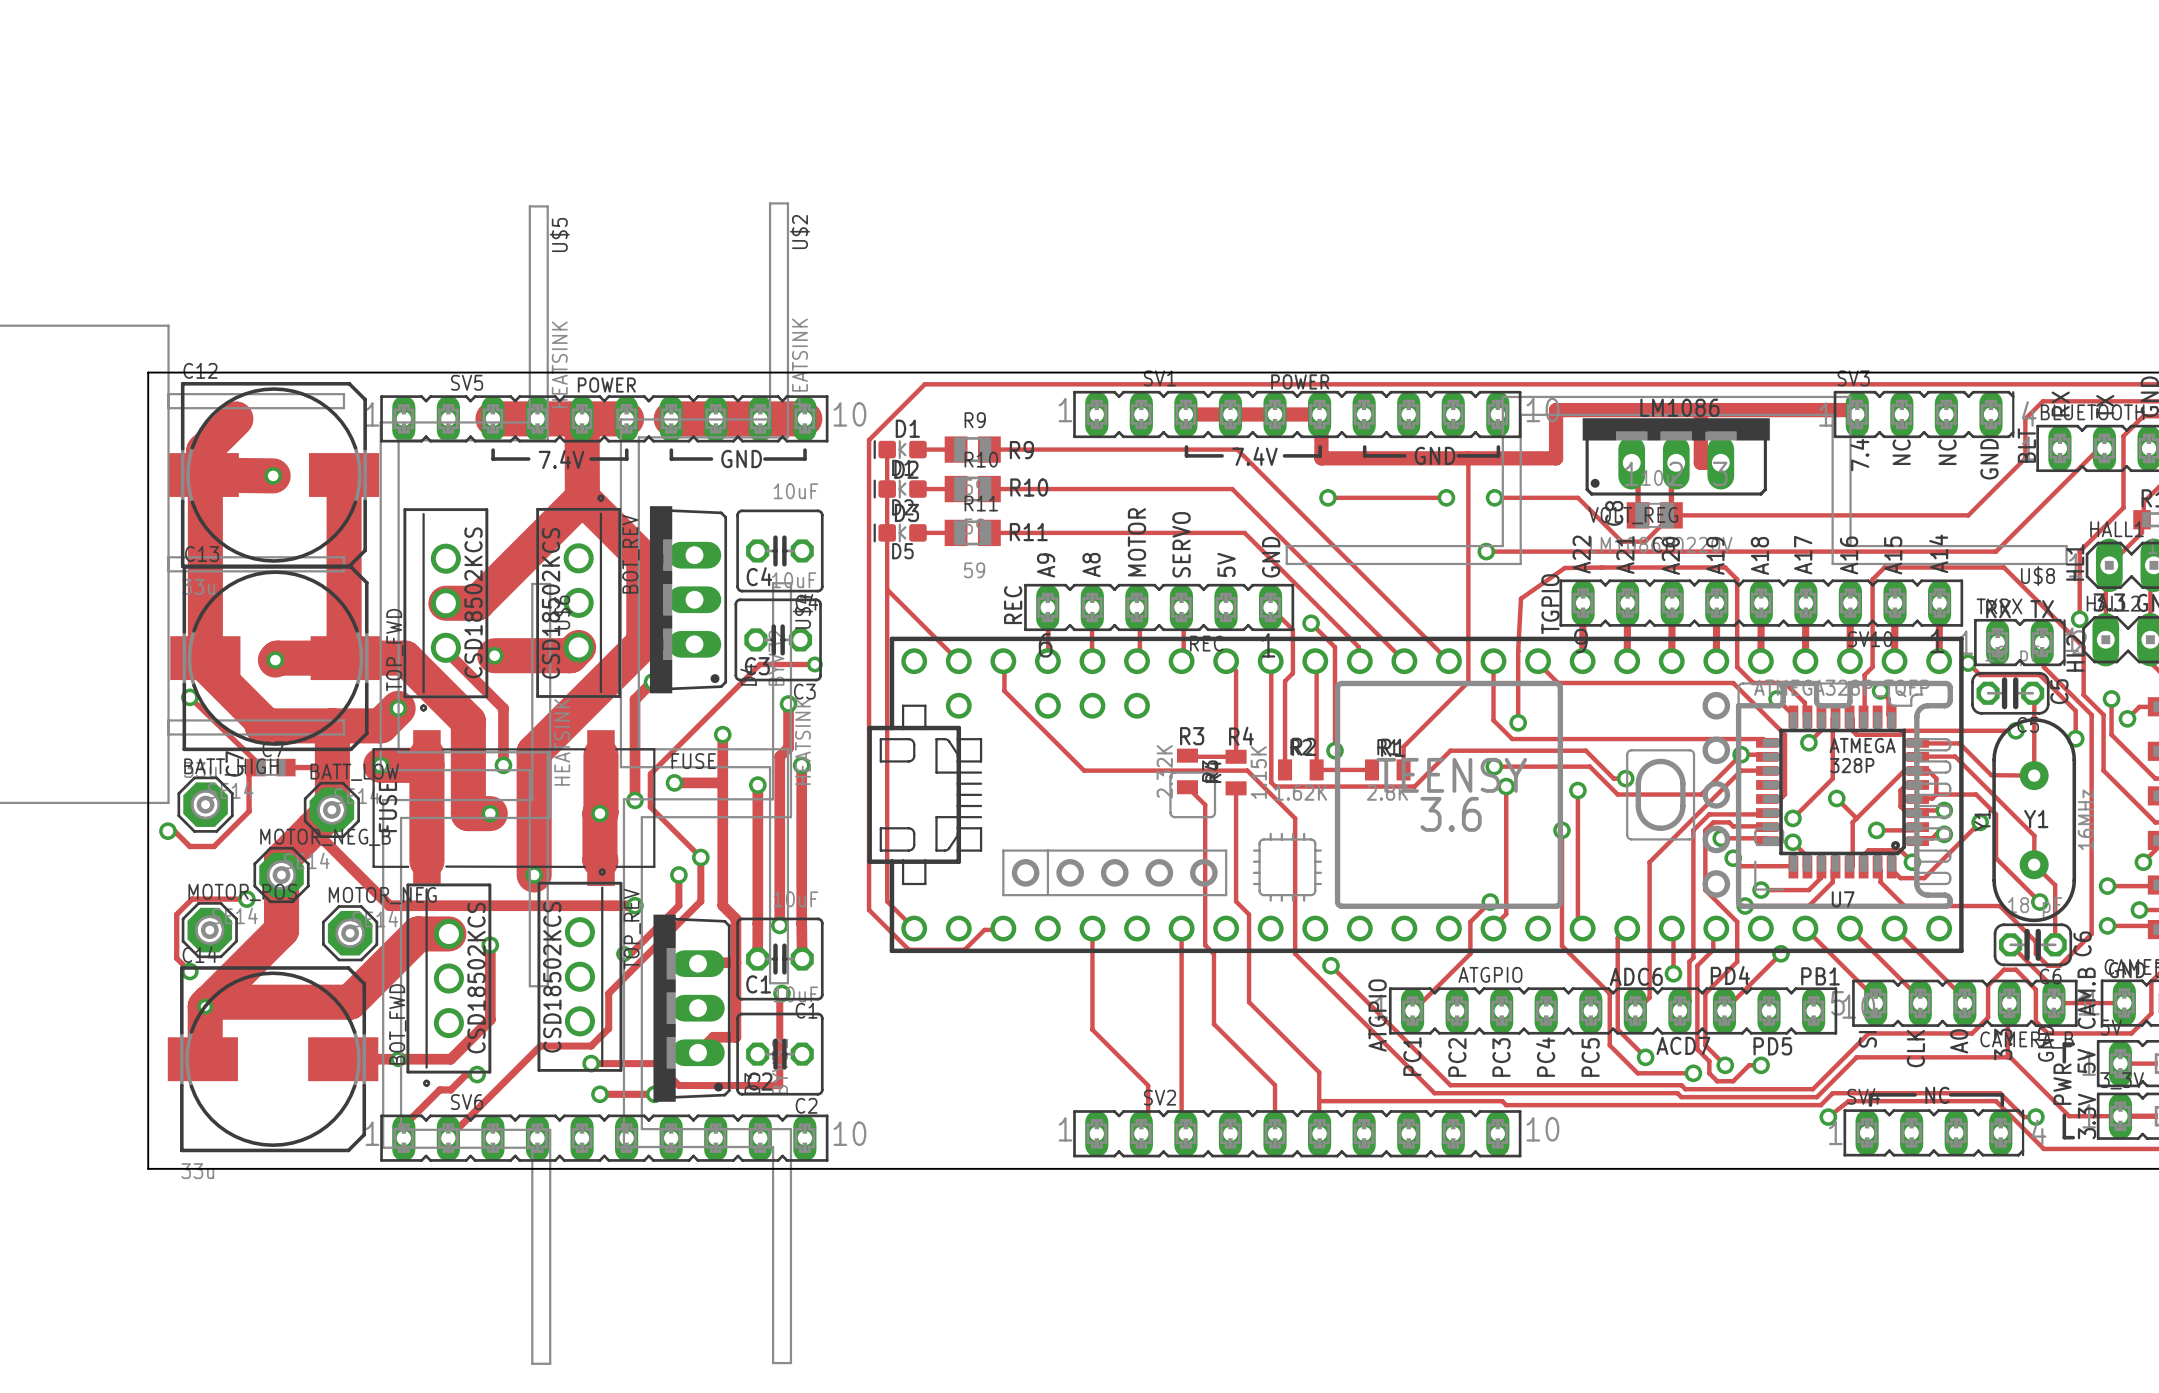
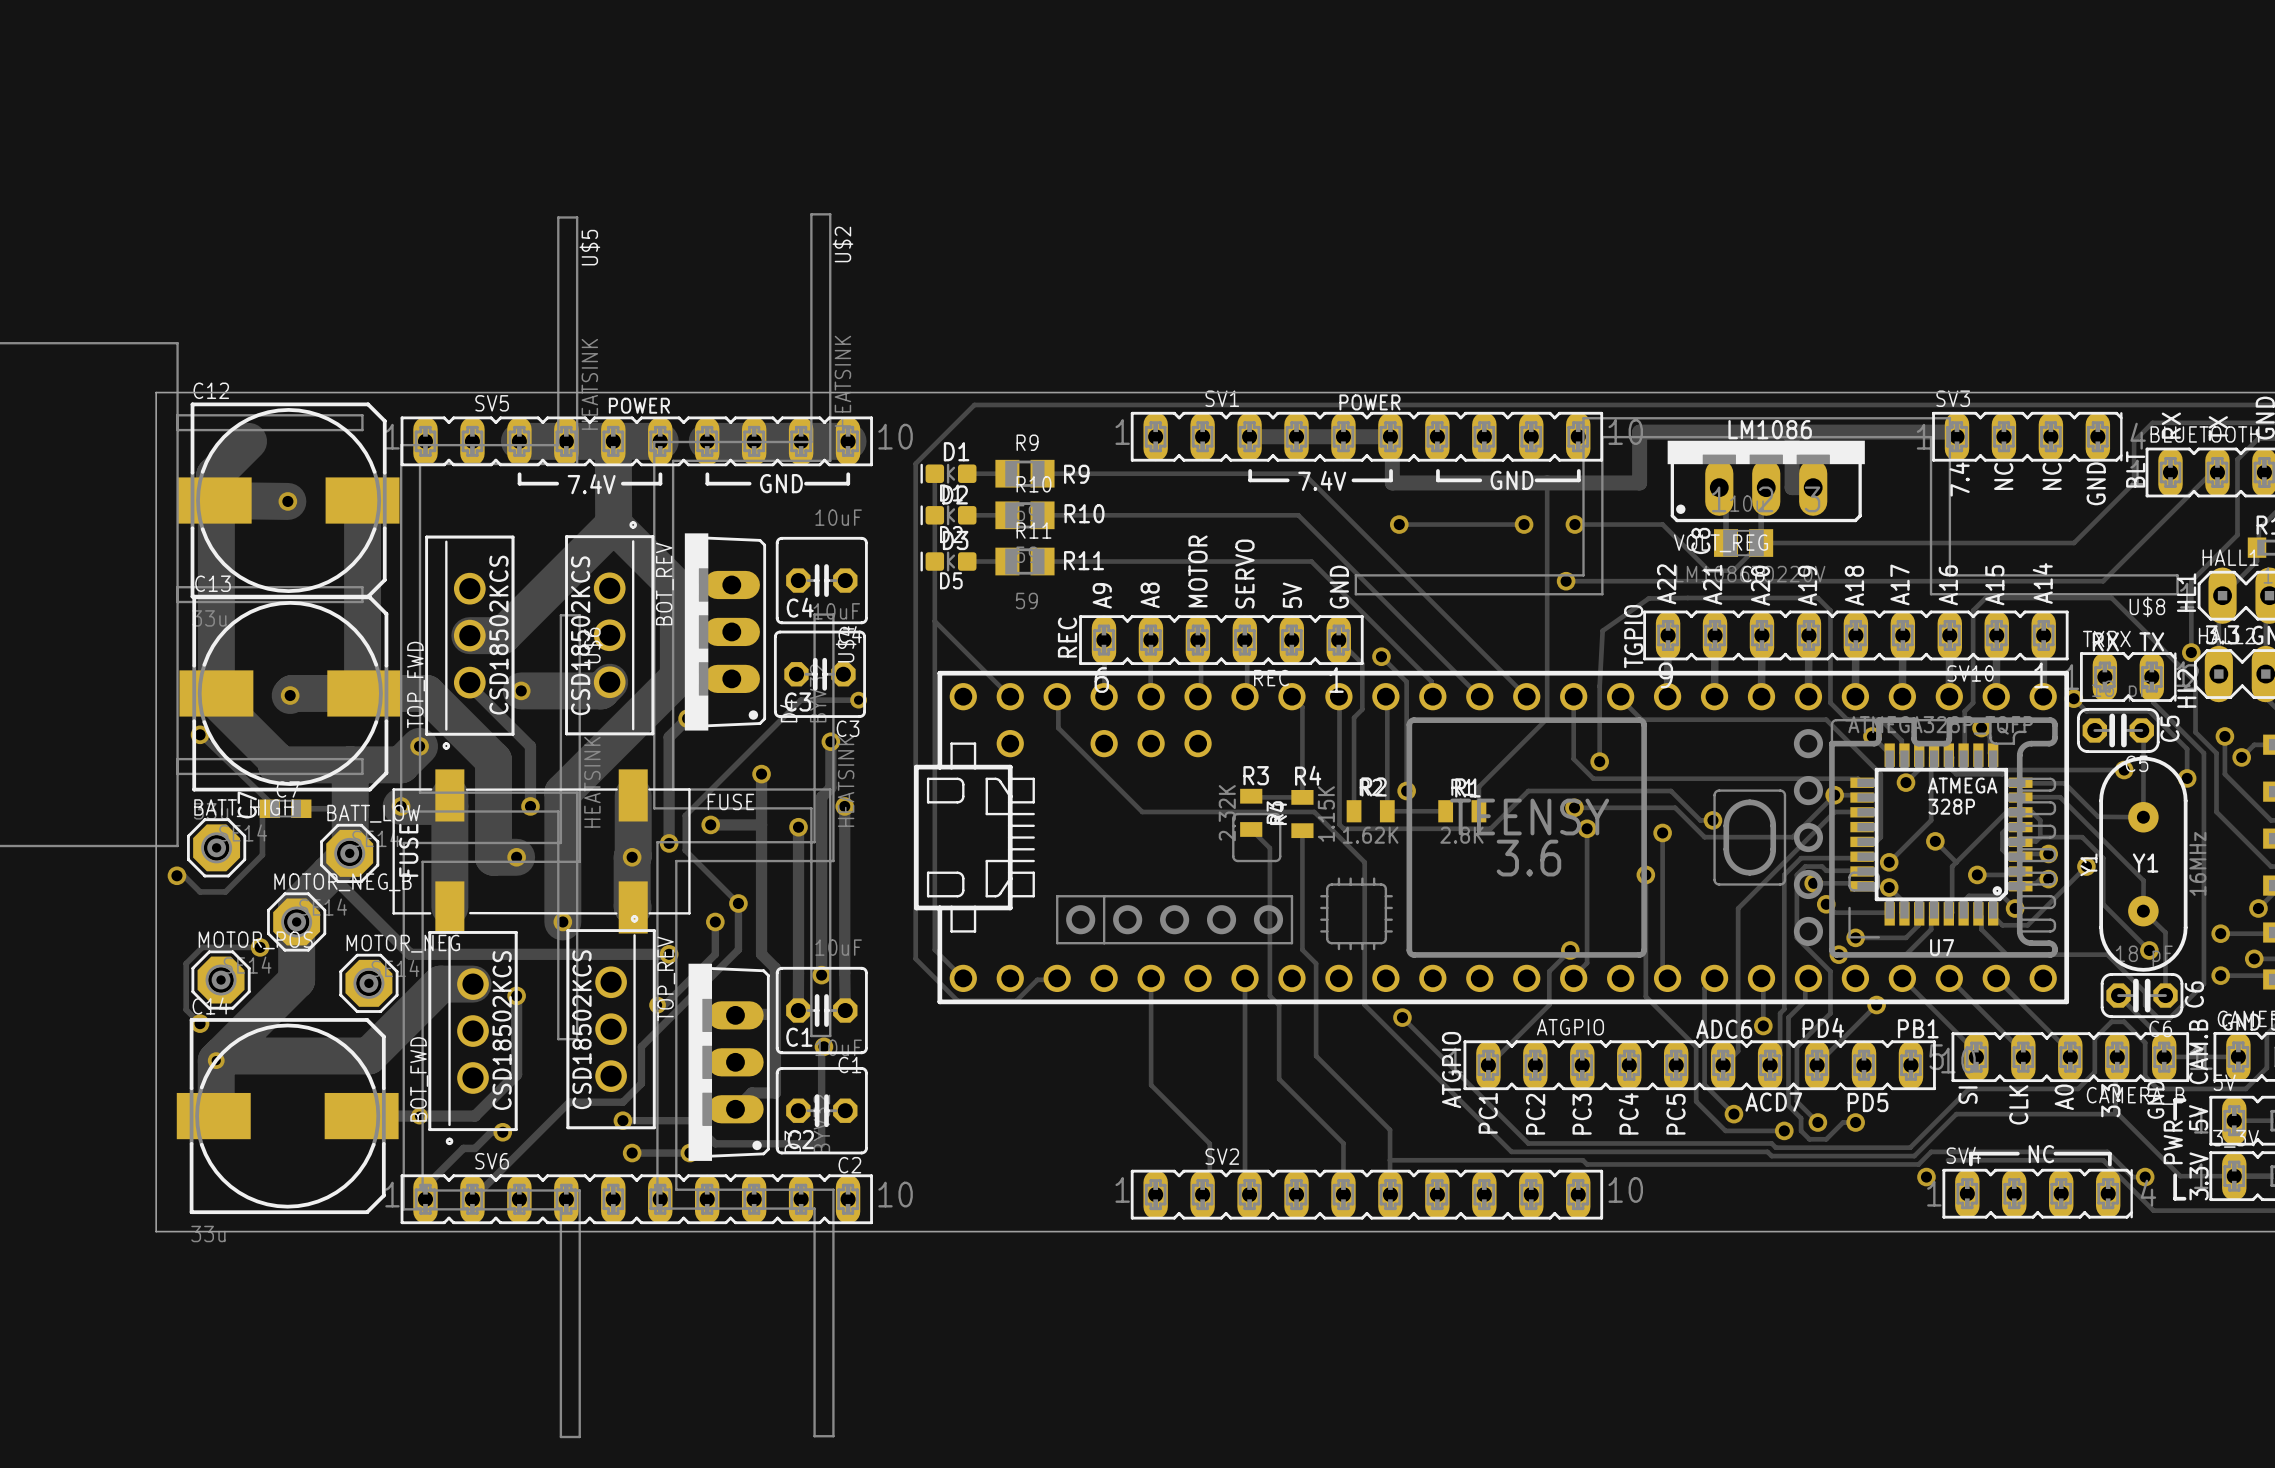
track: (1848, 1101) (1828, 1117) -> none

